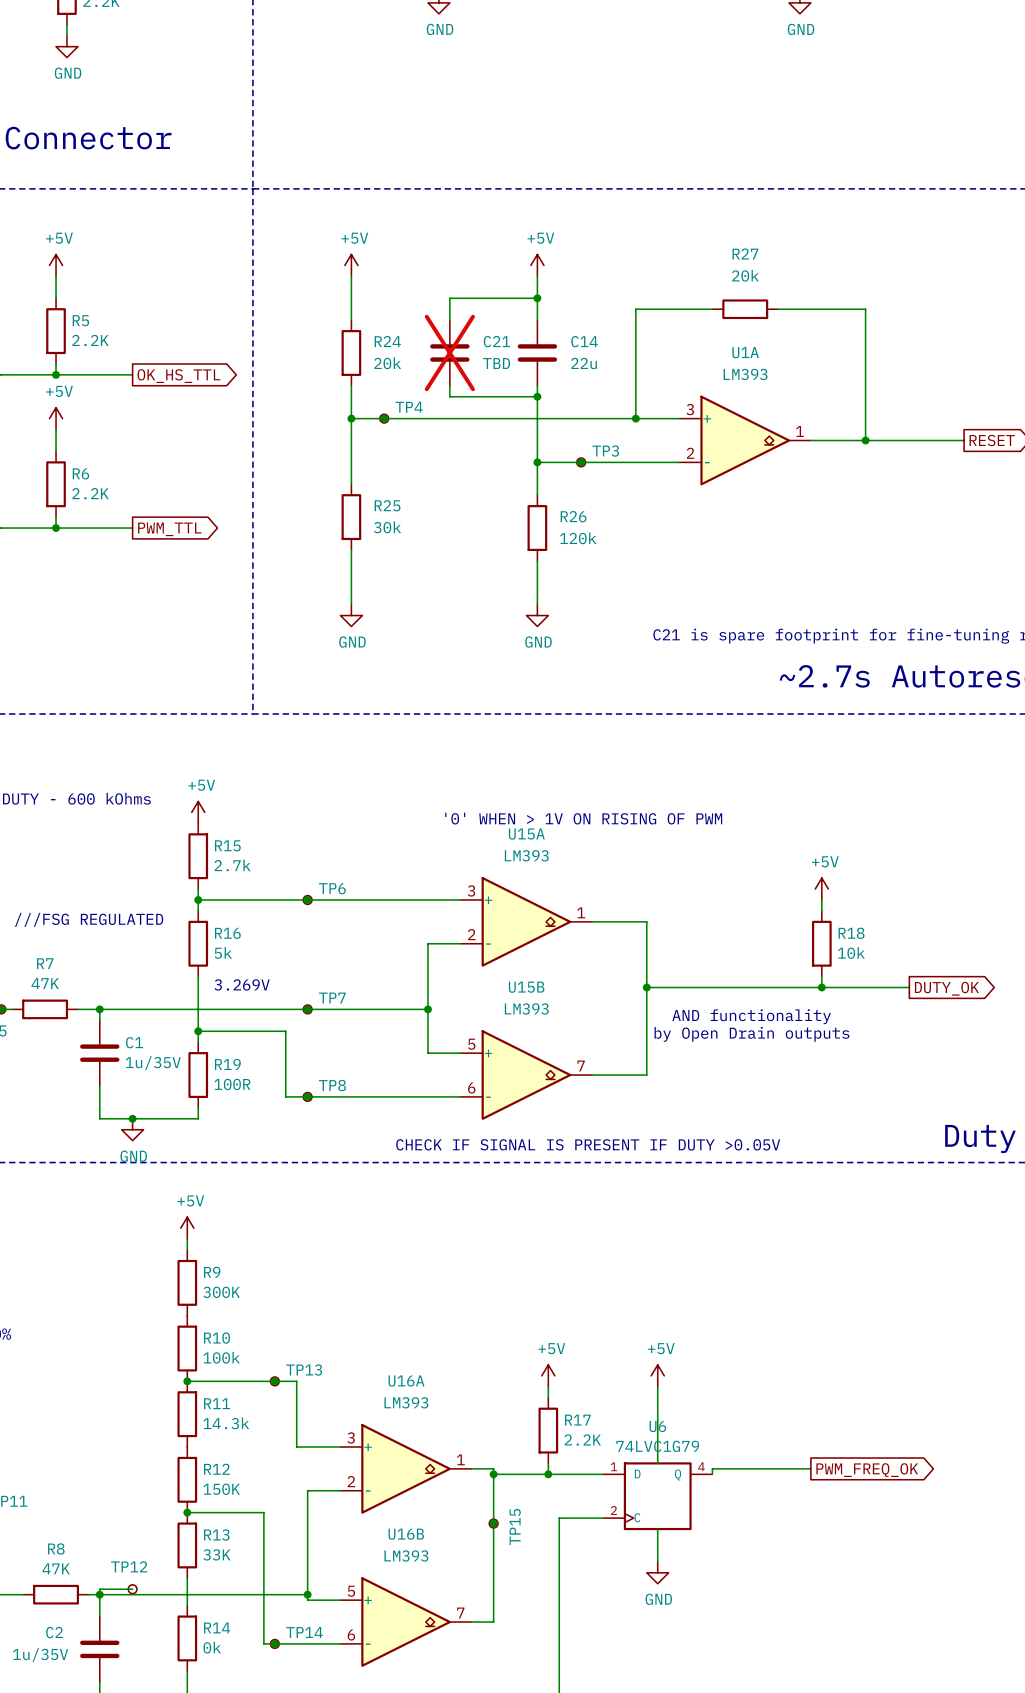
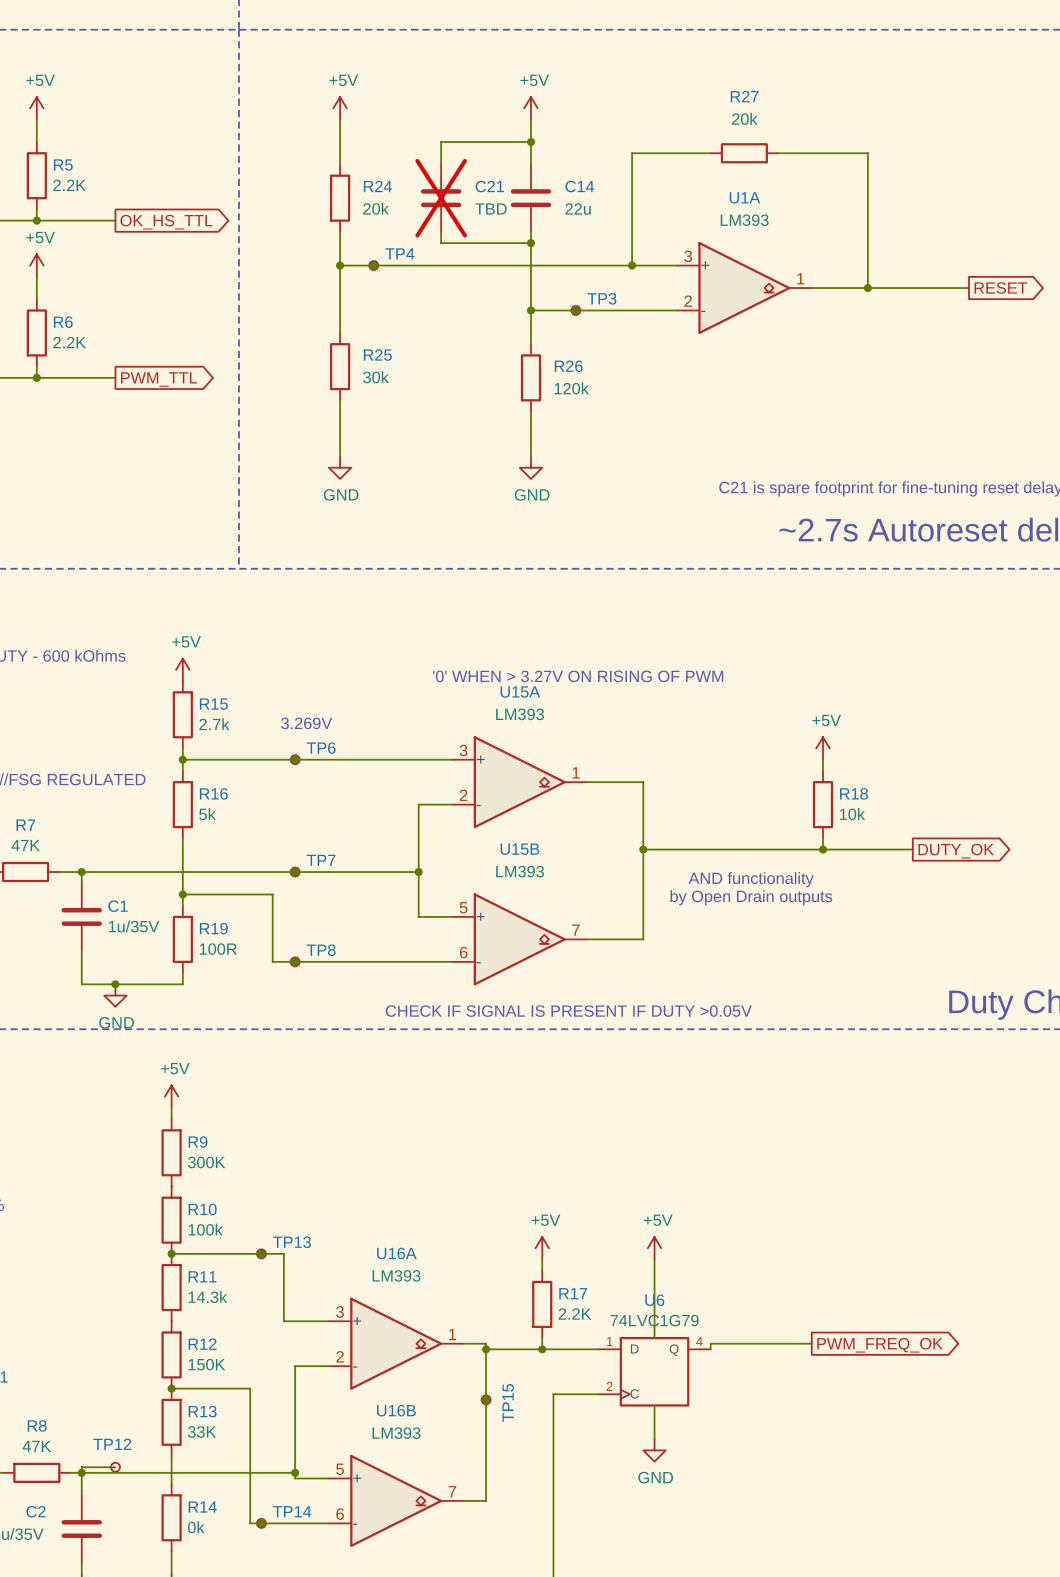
text: '0' WHEN > 1V ON RISING OF PWM (583, 818) -> '0' WHEN > 3.27V ON RISING OF PWM (578, 676)
text position: 3.269V (242, 984) -> 3.269V (306, 723)

